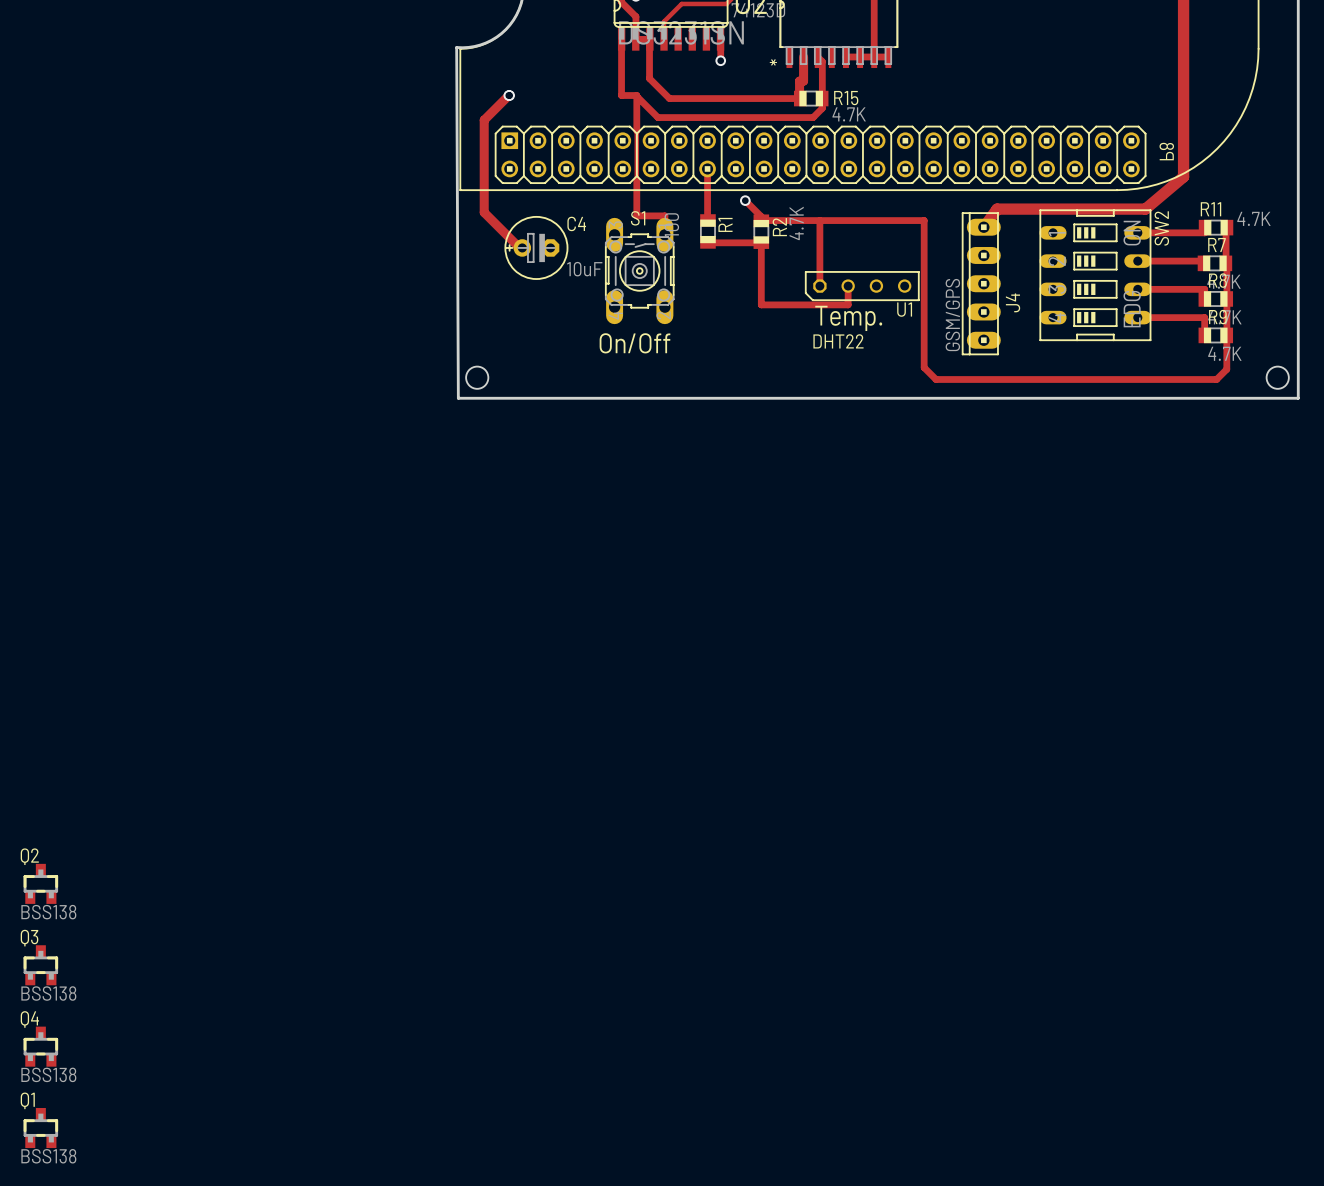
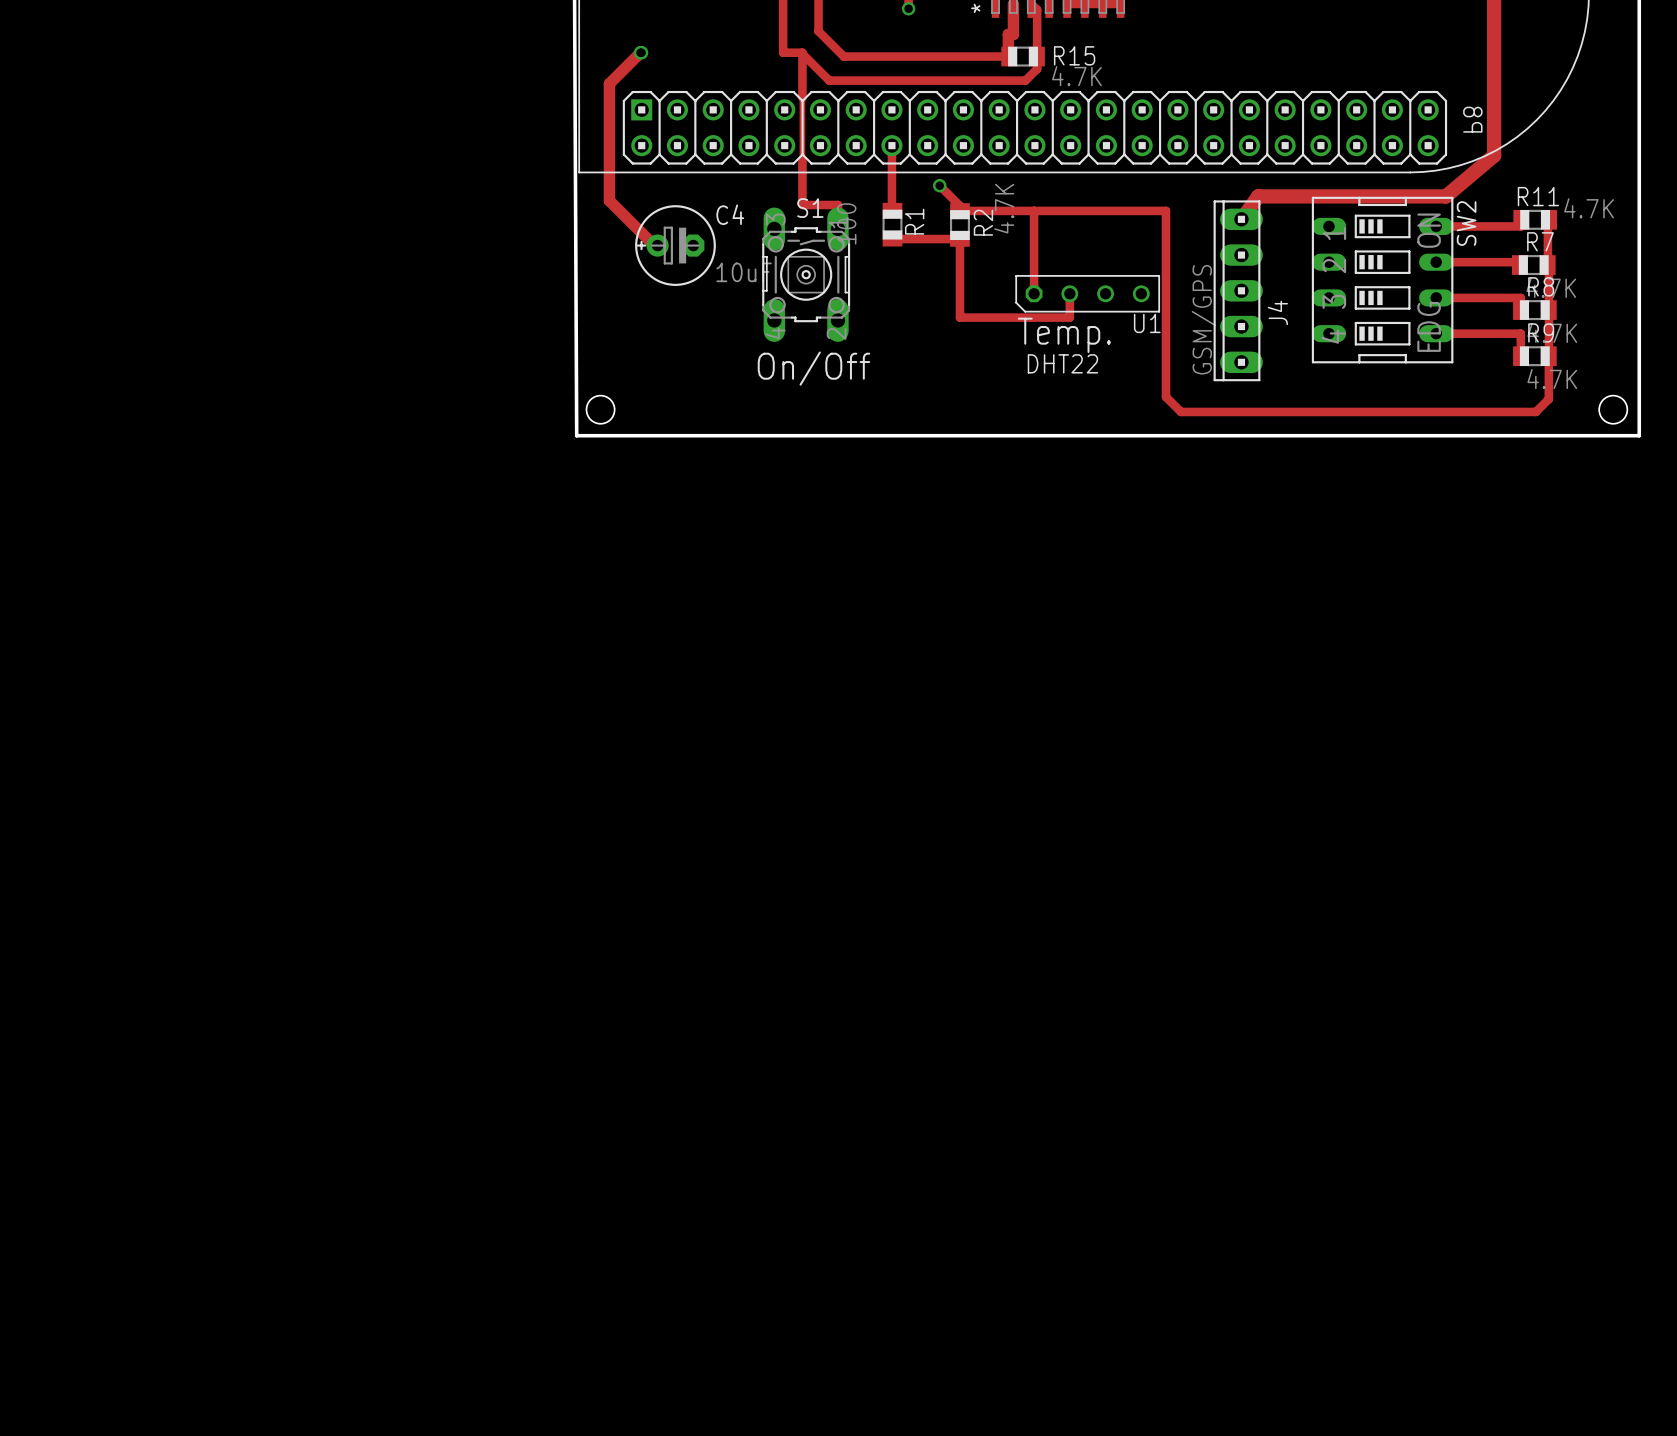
Q2: BSS138 (40, 883) -> none
Q3: BSS138 (40, 965) -> none
Q4: BSS138 (40, 1046) -> none
Q1: BSS138 (40, 1128) -> none

